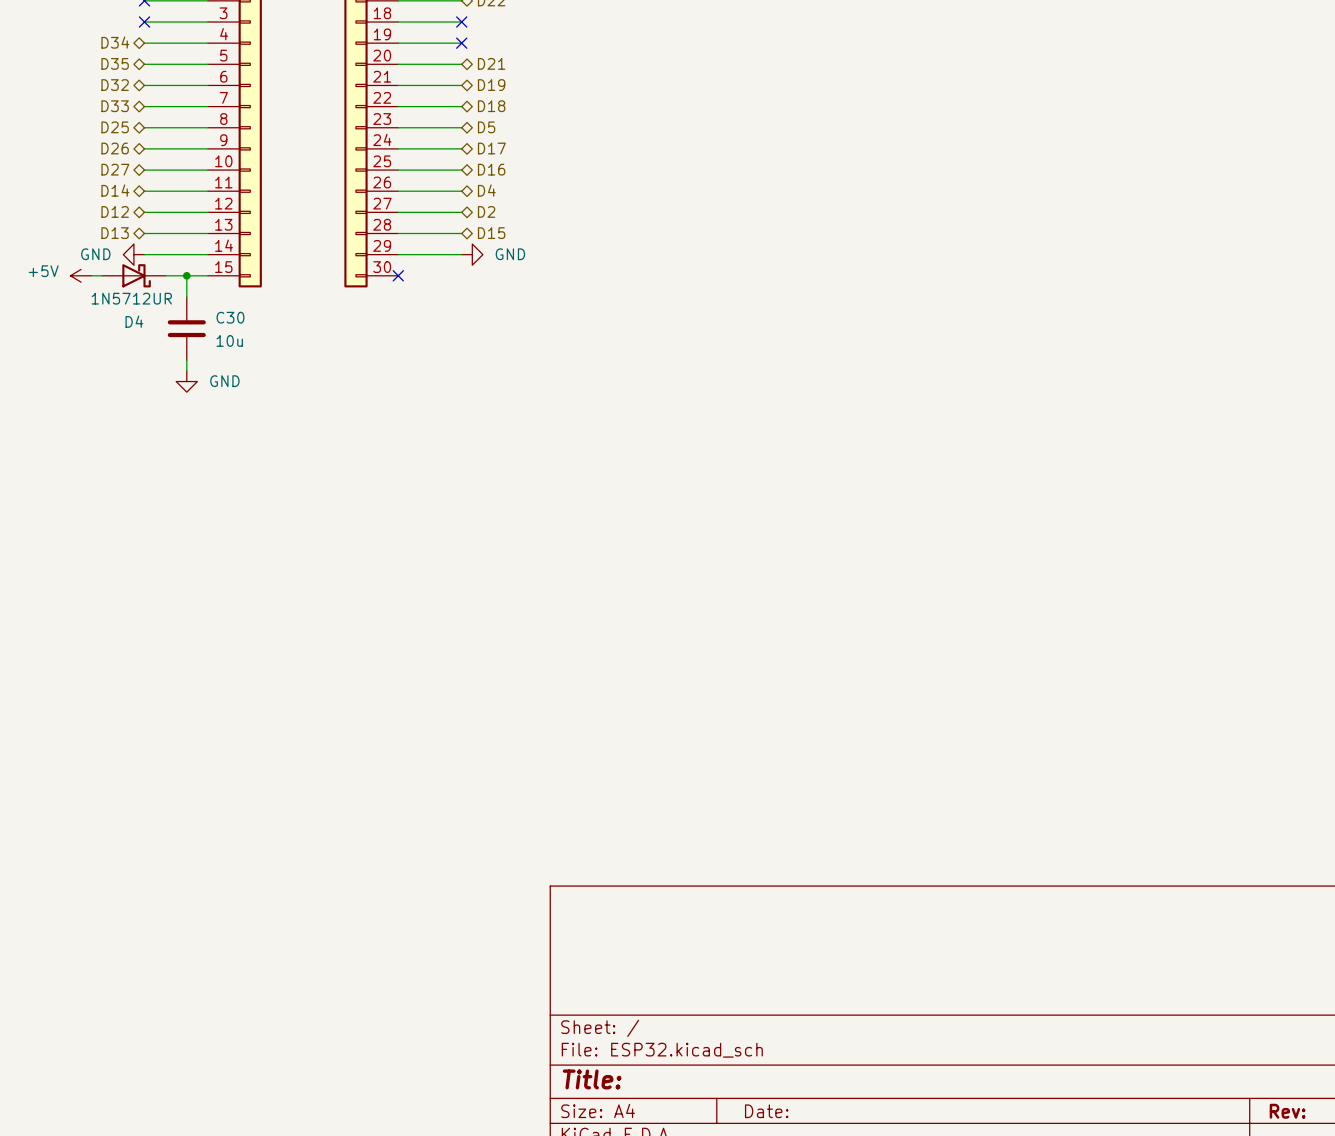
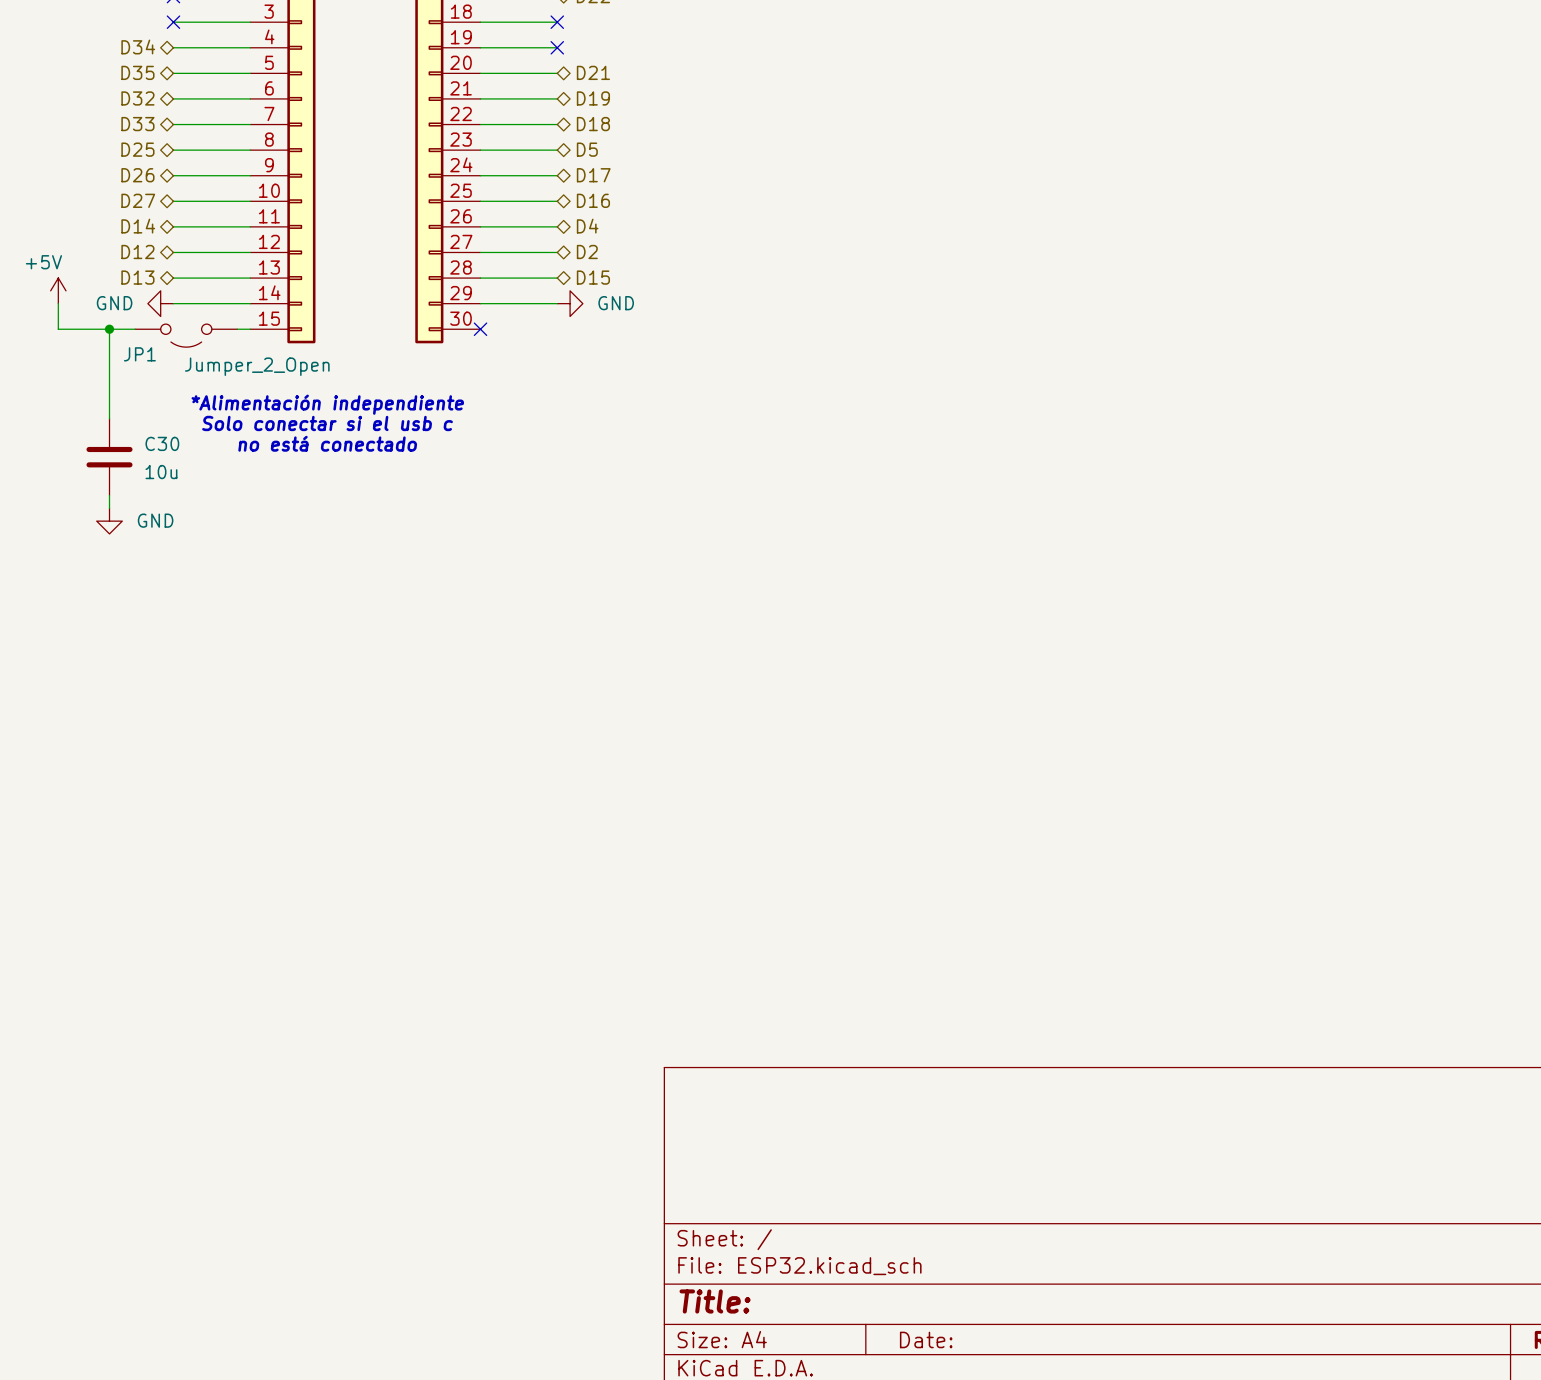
wire: none -> (58, 303) (58, 329) (109, 329) (109, 418)
power symbol text position: +5V (43, 271) -> +5V (43, 262)
power symbol rotation: 0° (81, 275) -> 90° clockwise (58, 290)
power symbol position: +5V (81, 275) -> +5V (58, 290)
junction: none -> (109, 329)
D4: 1N5712UR (133, 275) -> none
wire: (186, 275) (186, 296) -> none
junction: (186, 275) -> none
JP1: none -> Jumper_2_Open (186, 335)
C30 position: (186, 328) -> (109, 457)
text: none -> *Alimentación independiente (327, 404)
text: none -> Solo conectar si el usb c (327, 423)
wire: (186, 360) (186, 370) -> (109, 495) (109, 508)
text: none -> no está conectado (327, 443)
power symbol position: GND (186, 381) -> GND (109, 521)

